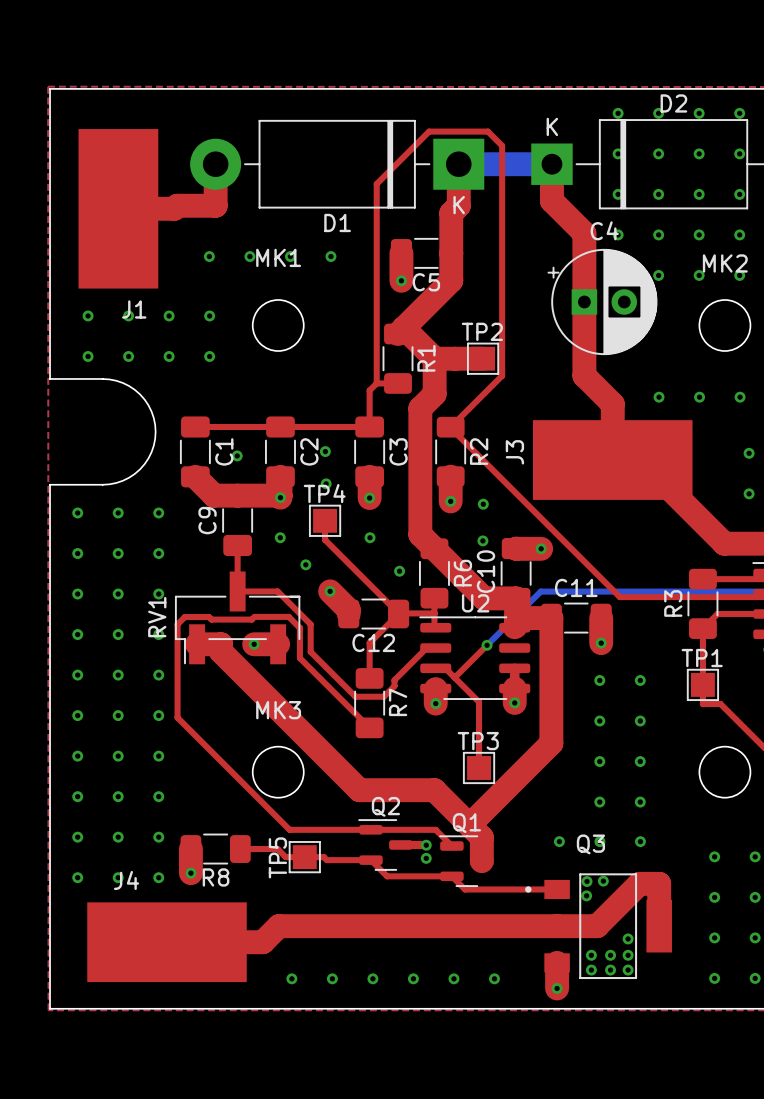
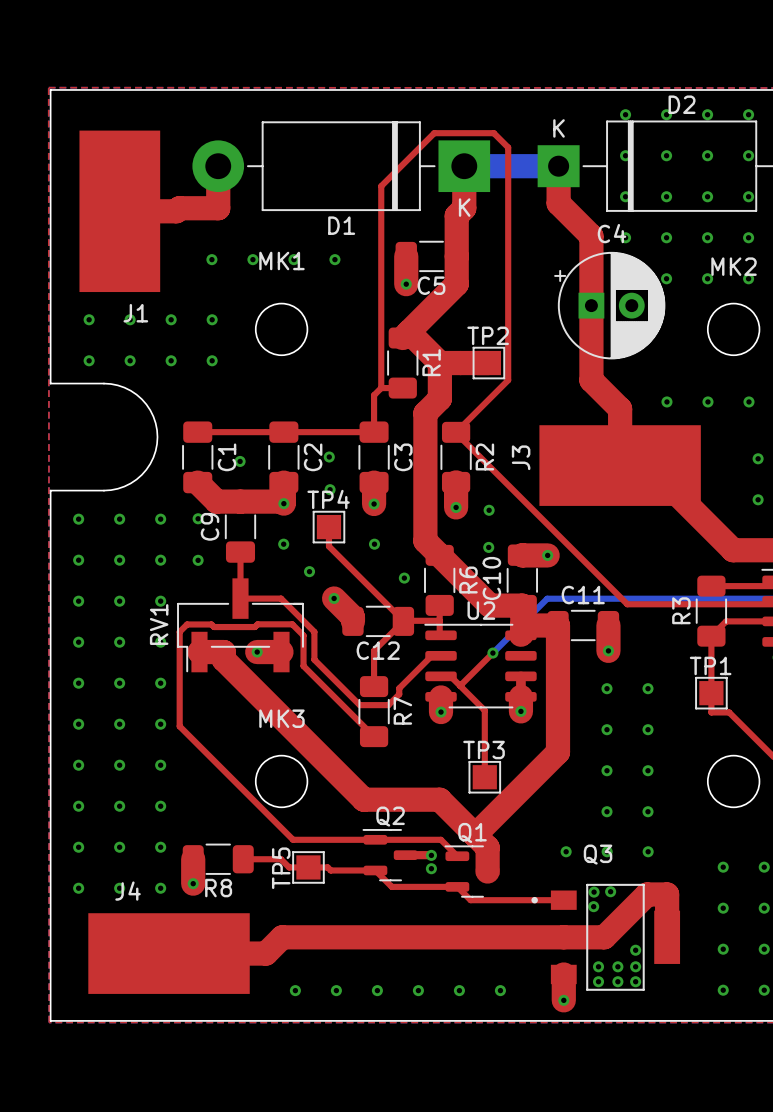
via: none -> (198, 518)
via: none -> (198, 560)

